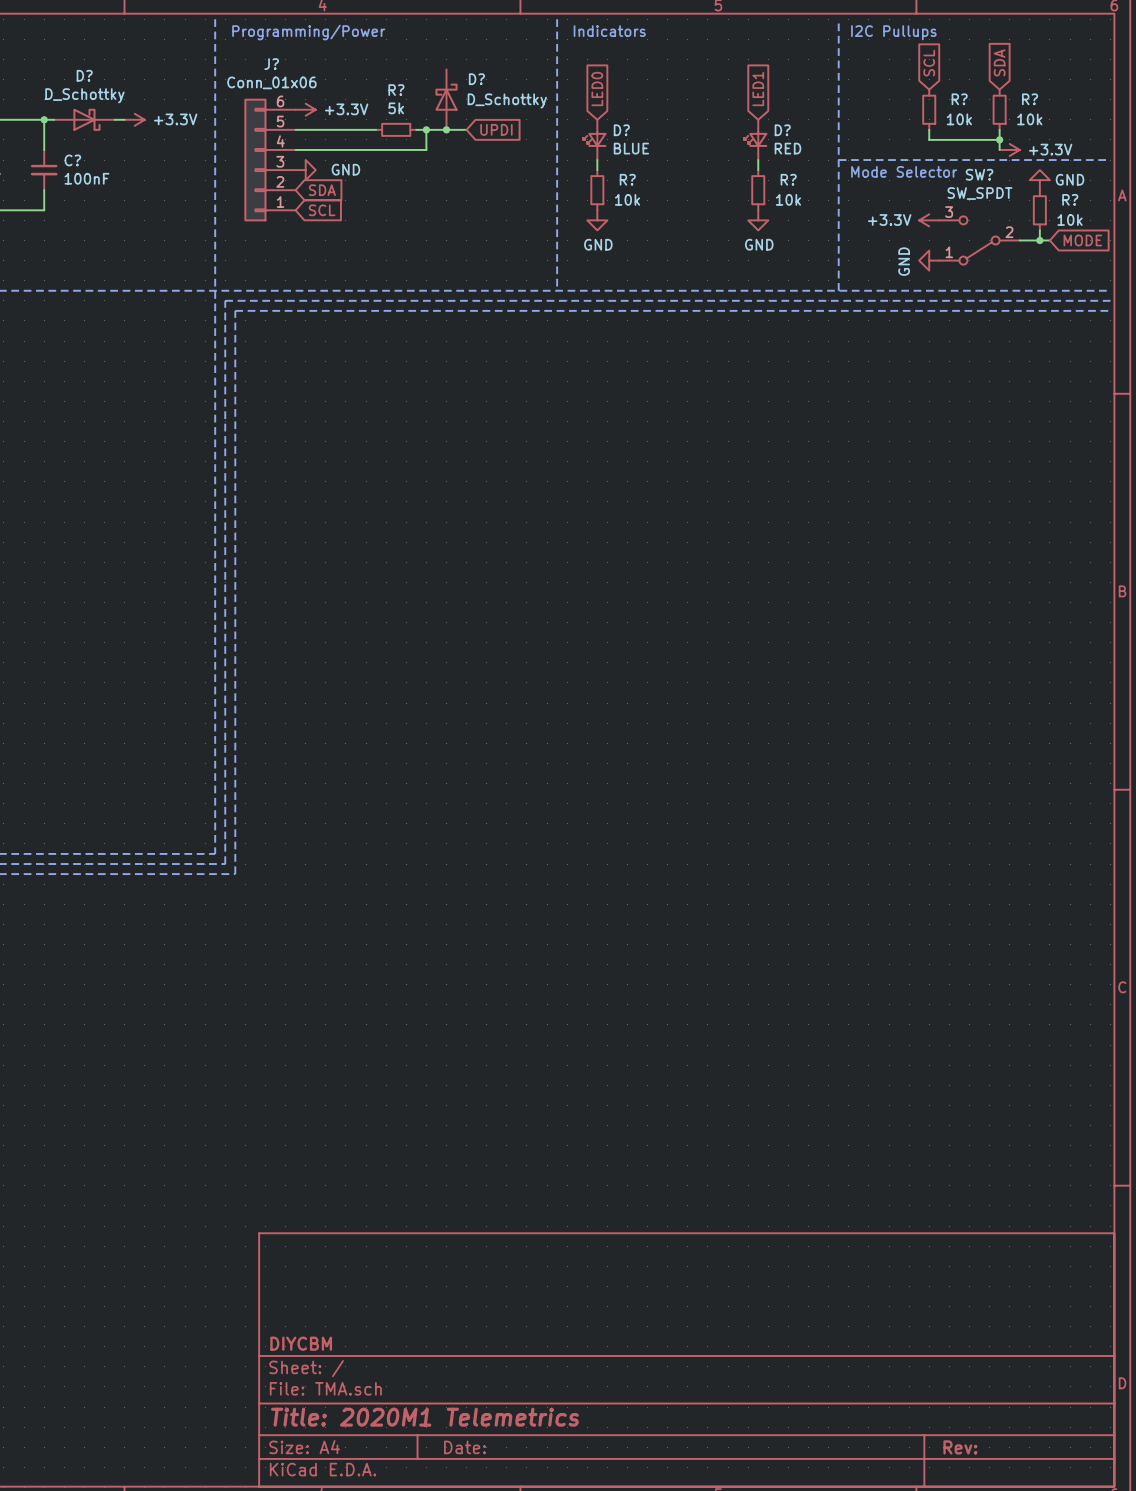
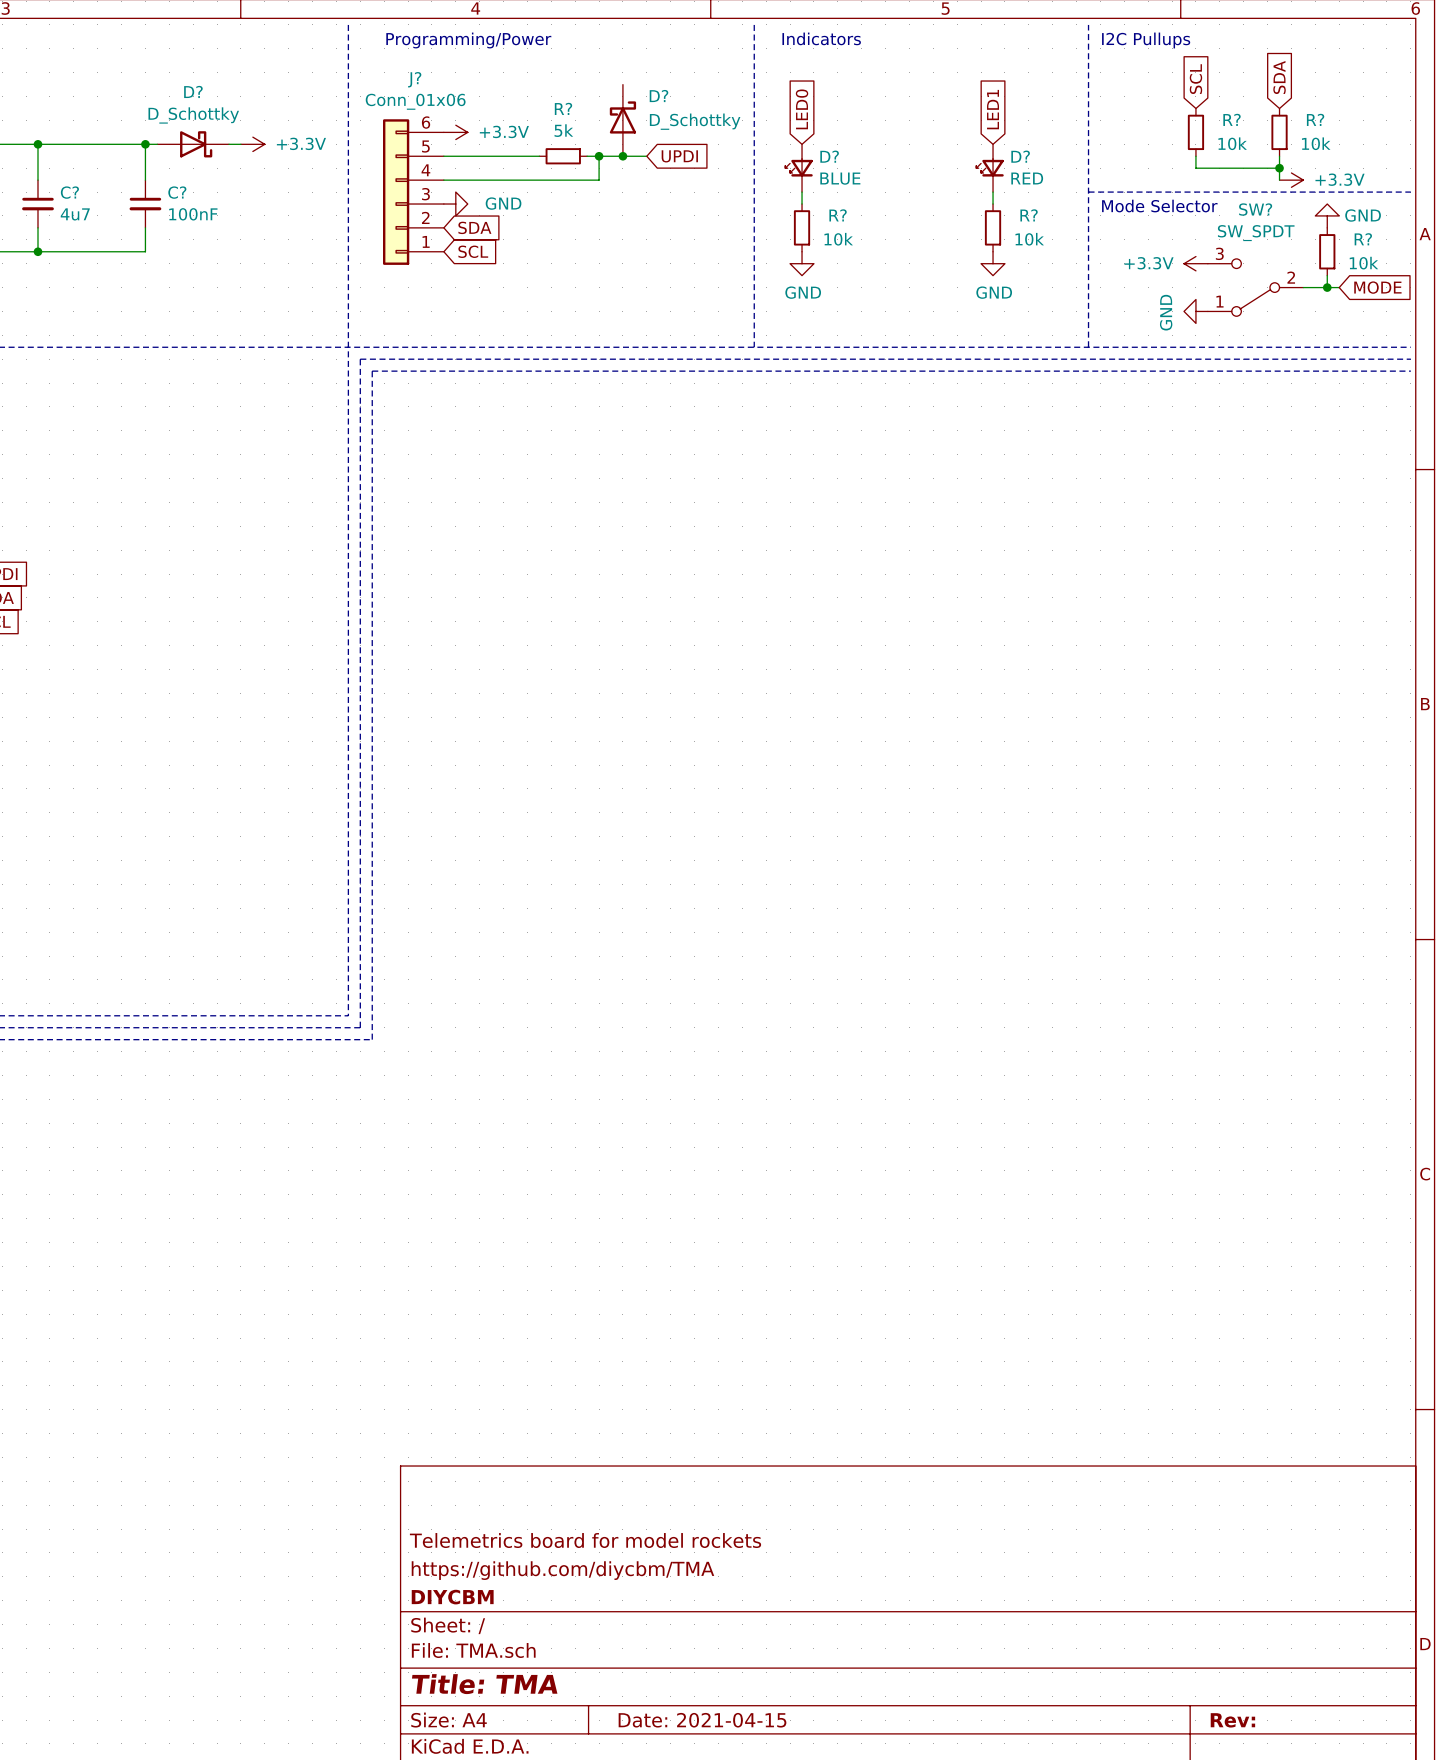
title block: none -> Telemetrics board for model rockets (585, 1540)
title block: none -> https://github.com/diycbm/TMA (562, 1570)
title block: Title: 2020M1 Telemetrics (424, 1417) -> Title: TMA (484, 1684)
title block: Date: (464, 1447) -> Date: 2021-04-15 (702, 1720)

